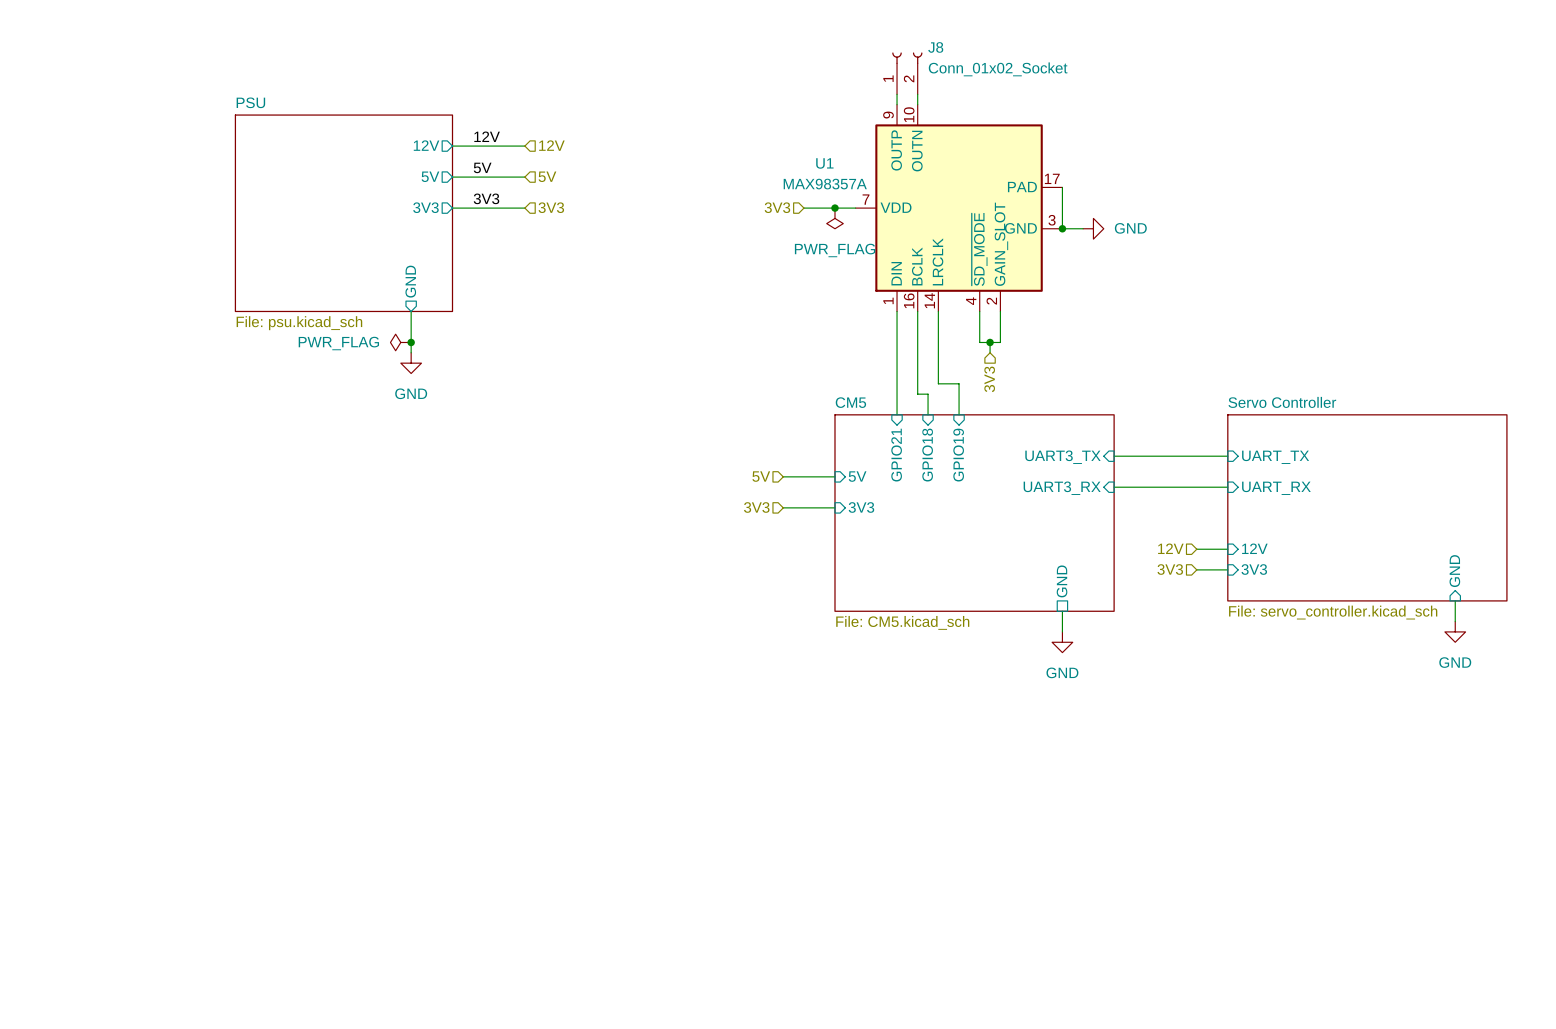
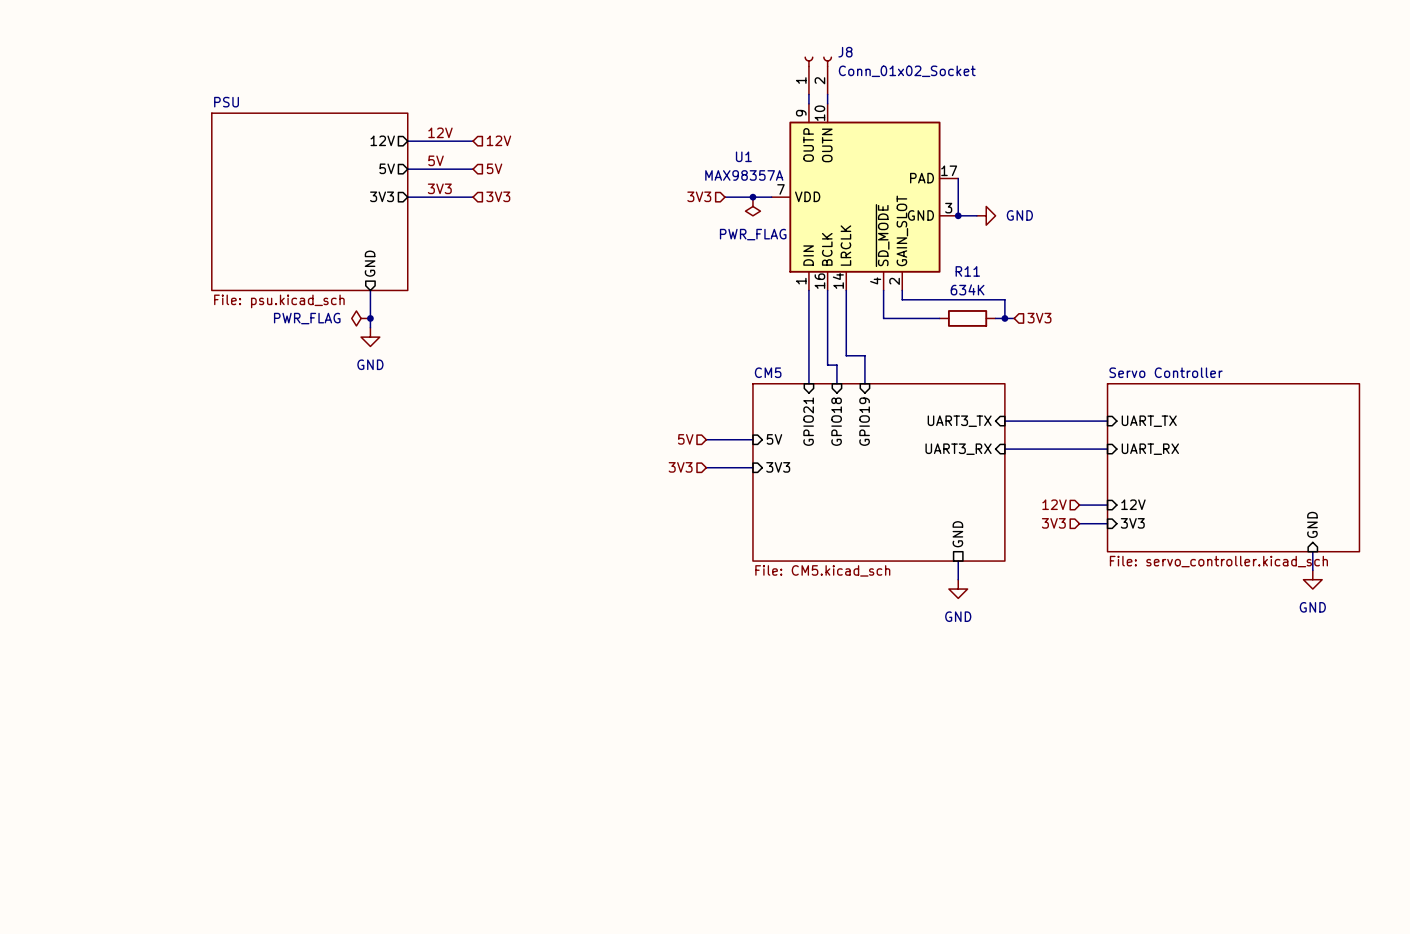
wire: (1000, 321) (1000, 342) -> (939, 318) (902, 318)
wire: none -> (902, 299) (1004, 299) (1004, 318)
wire: (990, 342) (990, 352) -> none
junction: (990, 342) -> none
R11: none -> 634K (967, 318)
wire: none -> (995, 318) (1014, 318)
junction: none -> (1004, 318)
hierarchical label rotation: 0° (989, 379) -> 90° counterclockwise (1039, 318)
hierarchical label position: 3V3 (989, 379) -> 3V3 (1039, 318)

